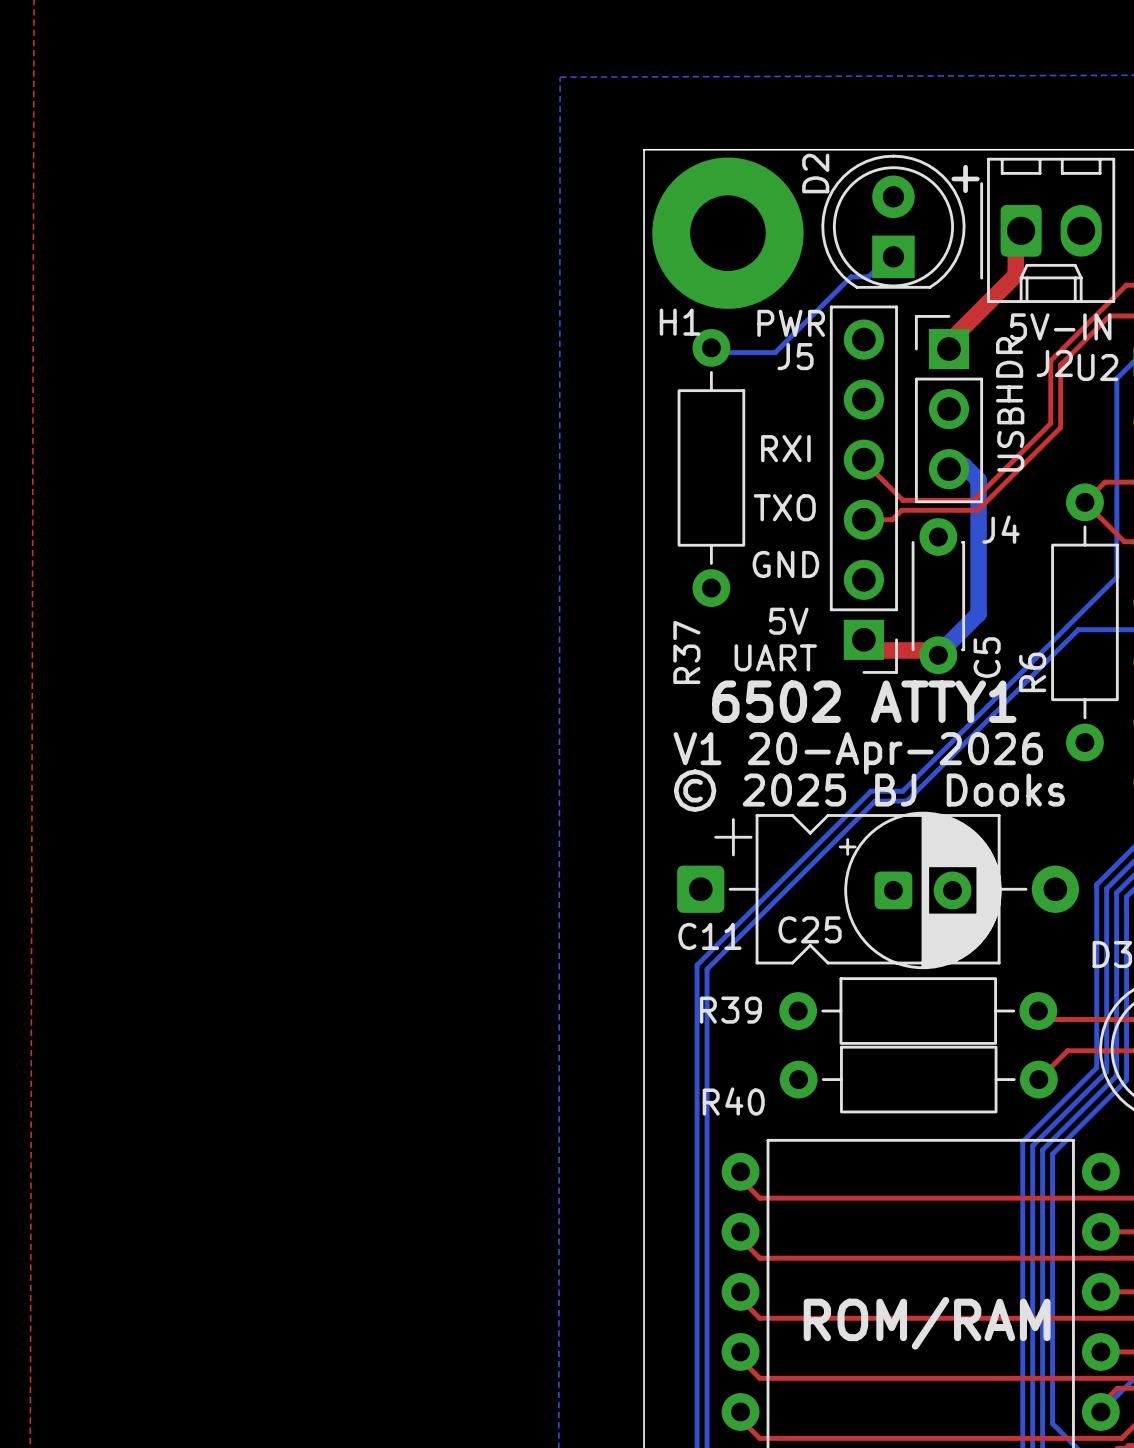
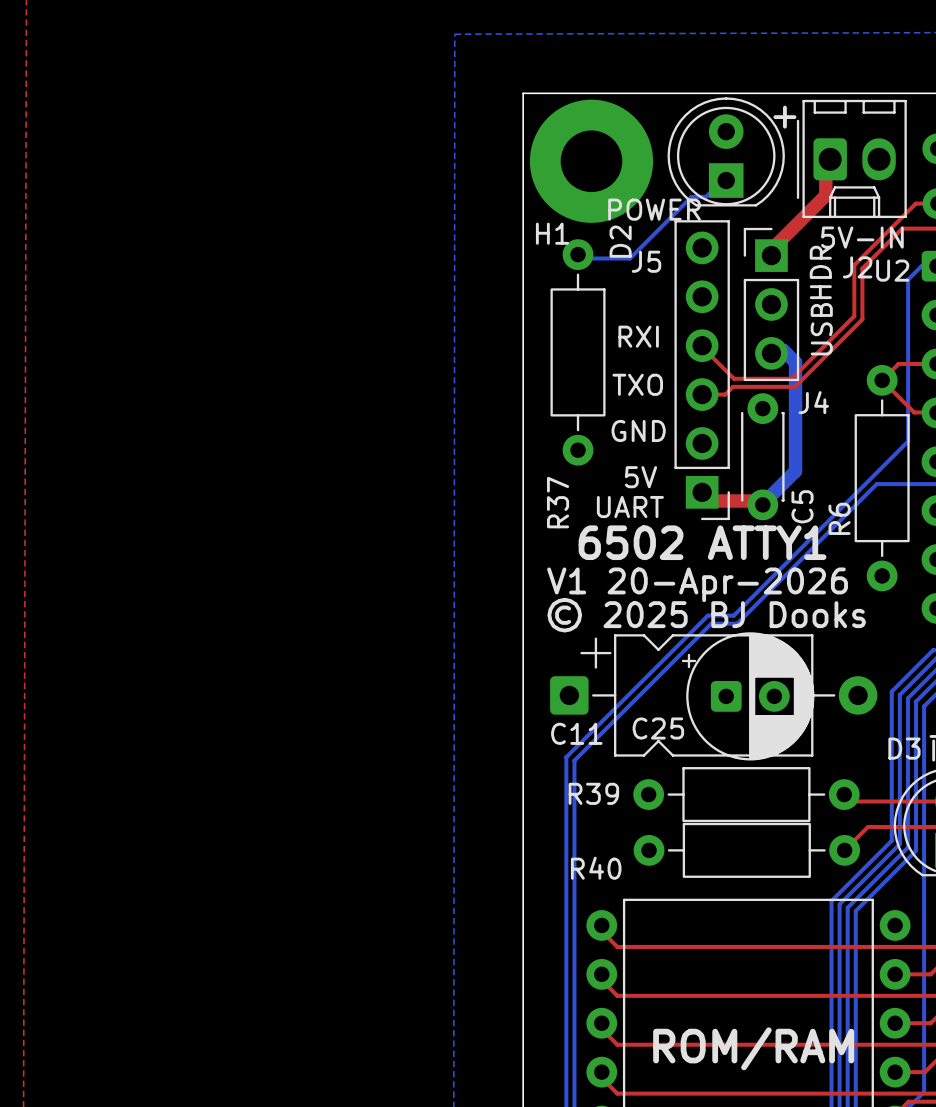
D2 name position: D2 (815, 173) -> D2 (620, 241)
text: PWR (791, 323) -> POWER (654, 209)

